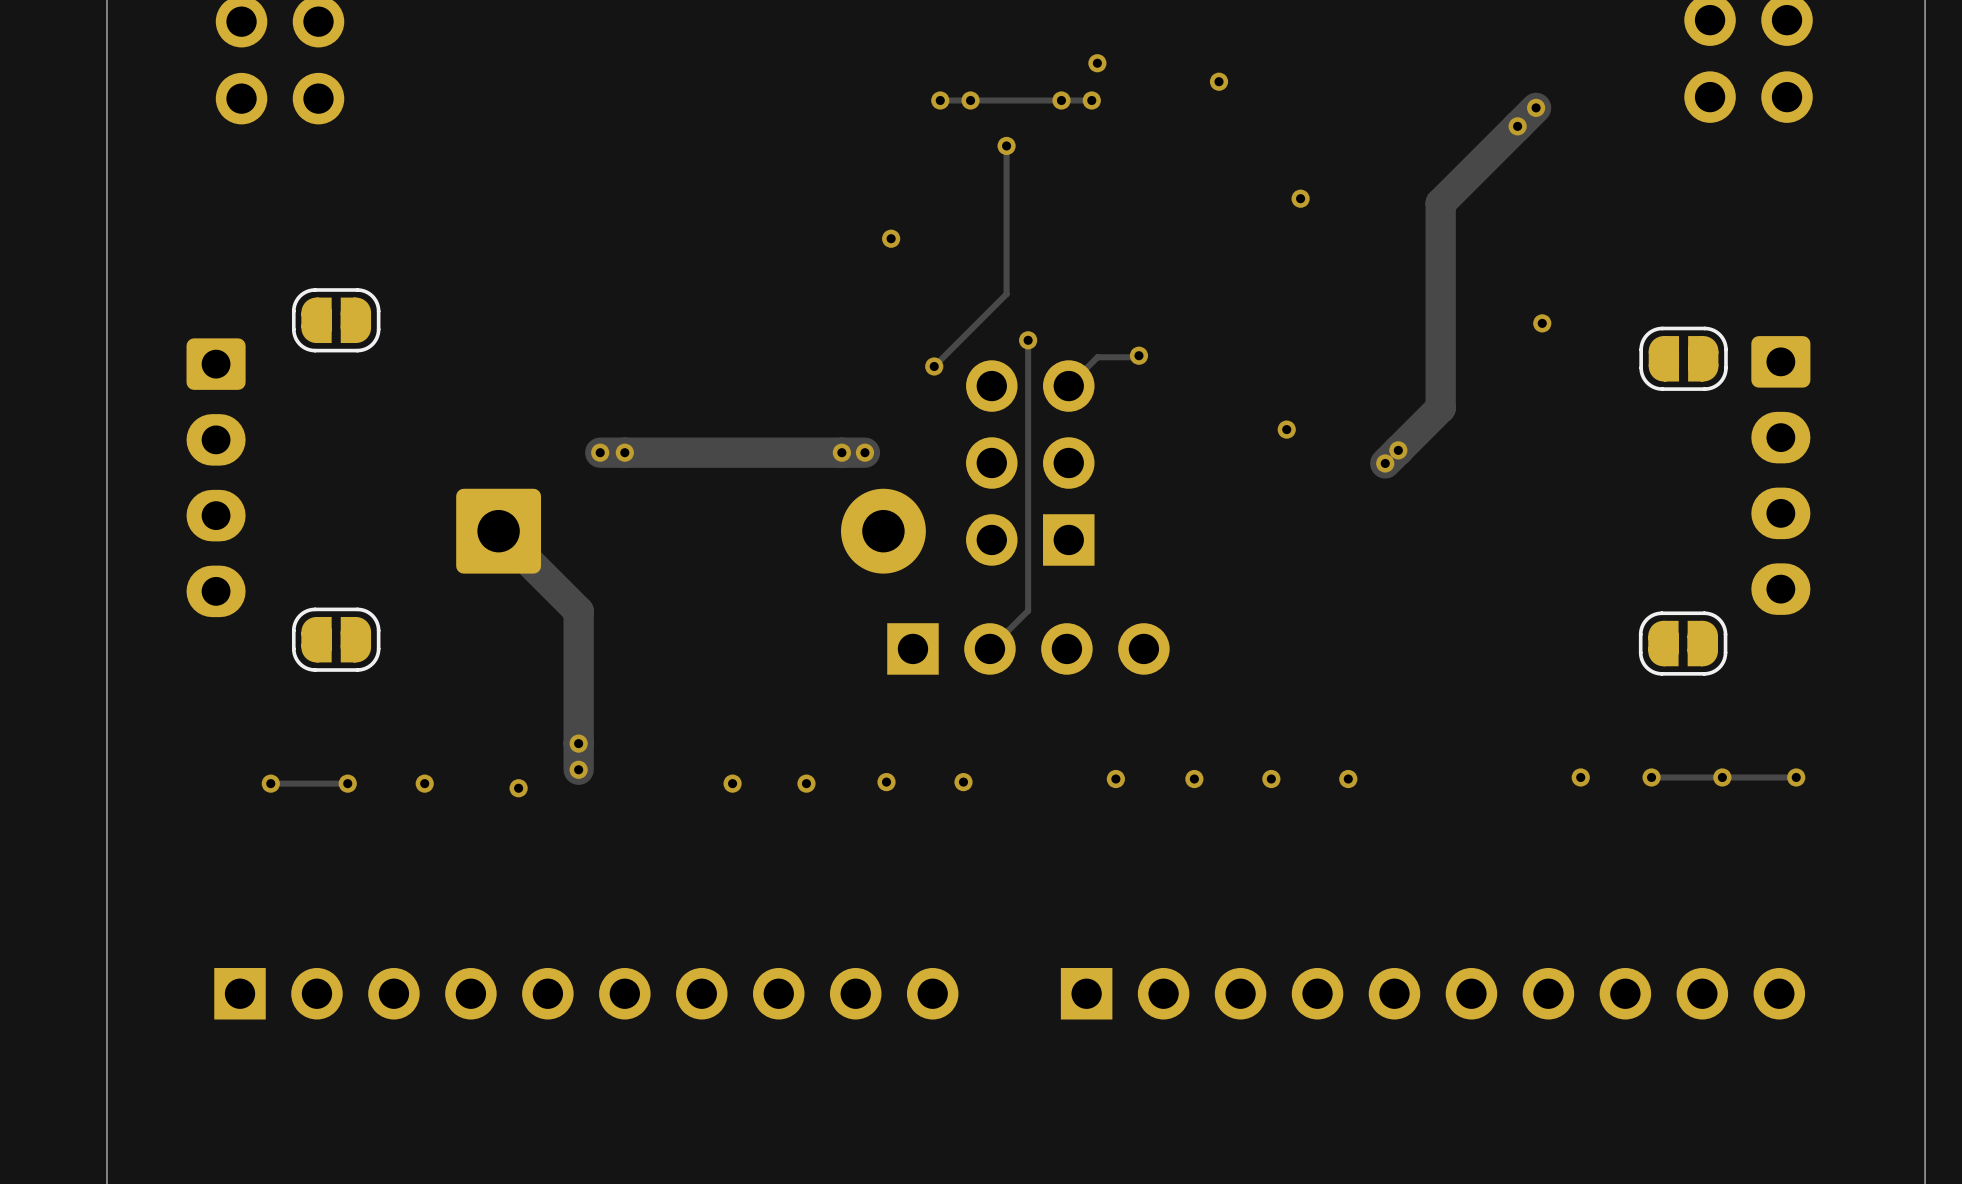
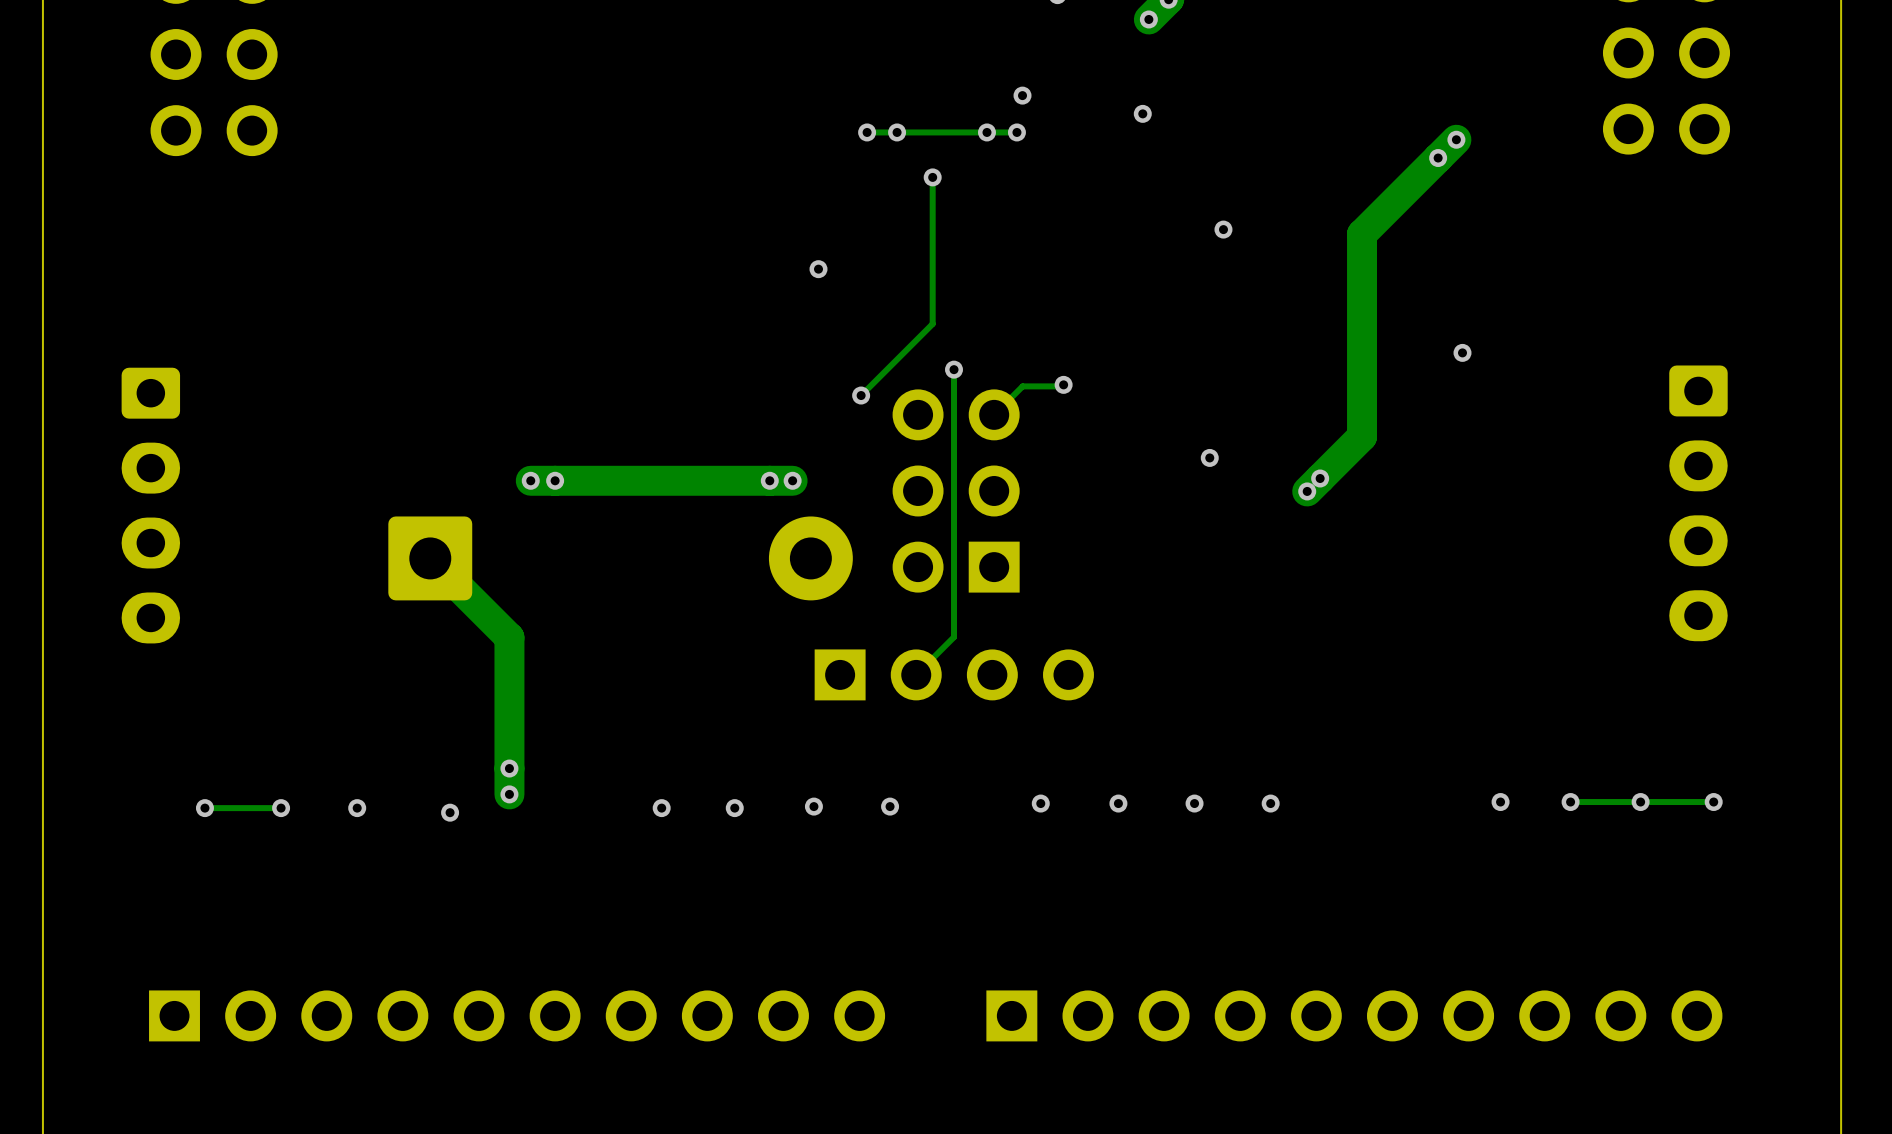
part: (336, 320) -> none
part: (1683, 358) -> none
part: (336, 639) -> none
part: (1683, 643) -> none

